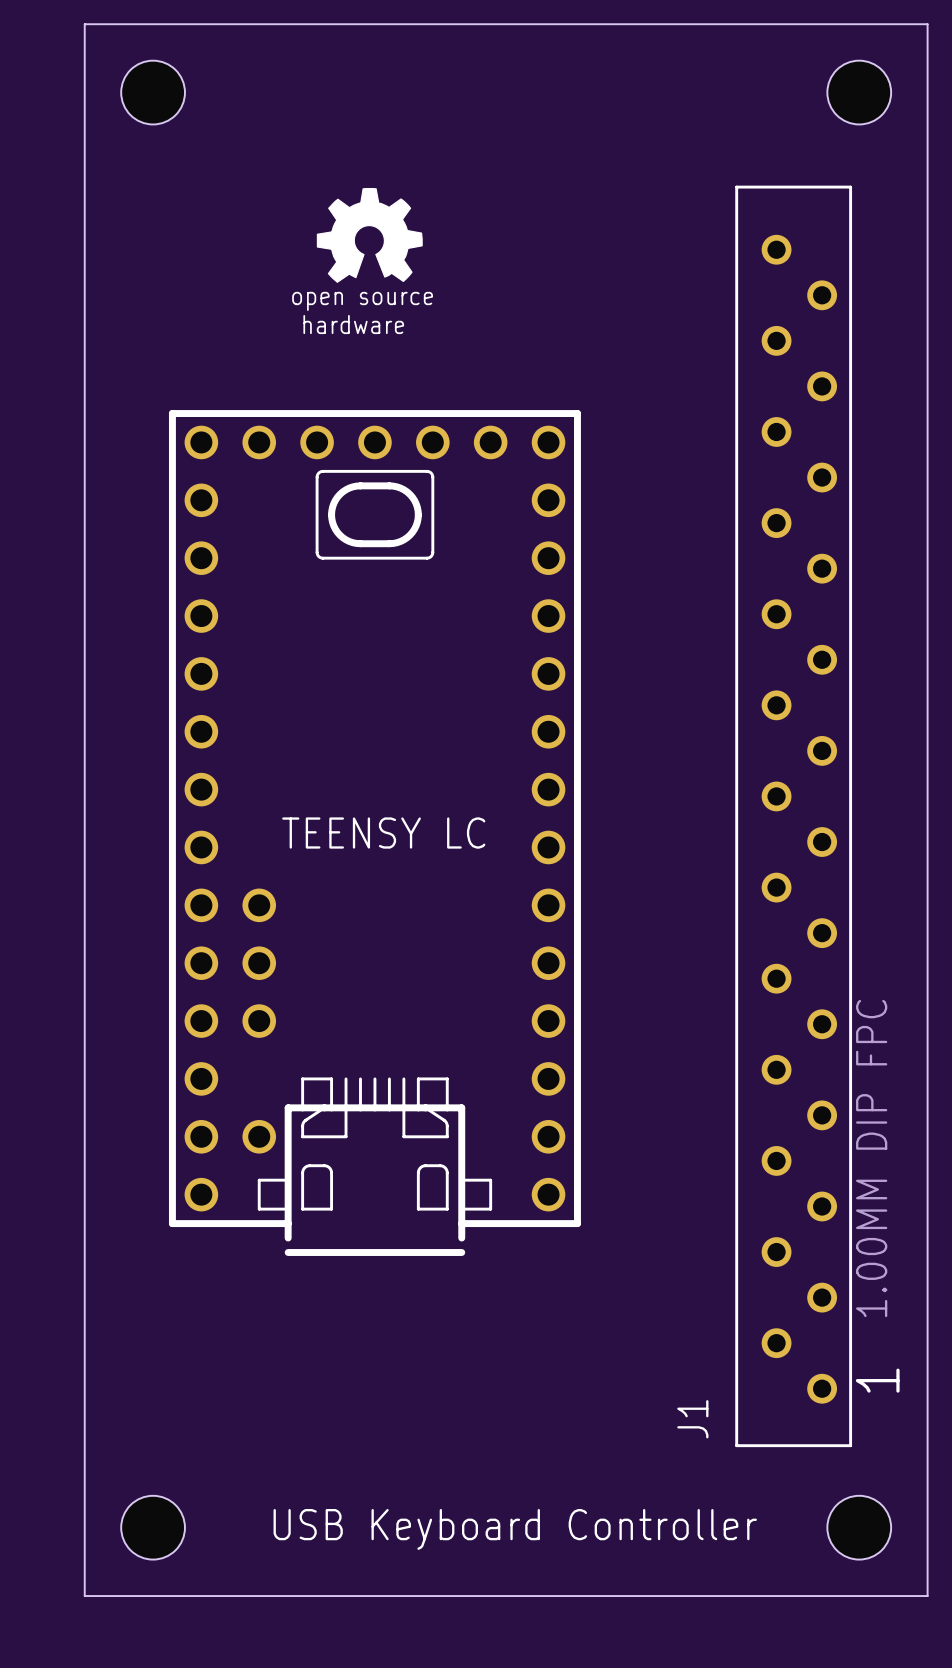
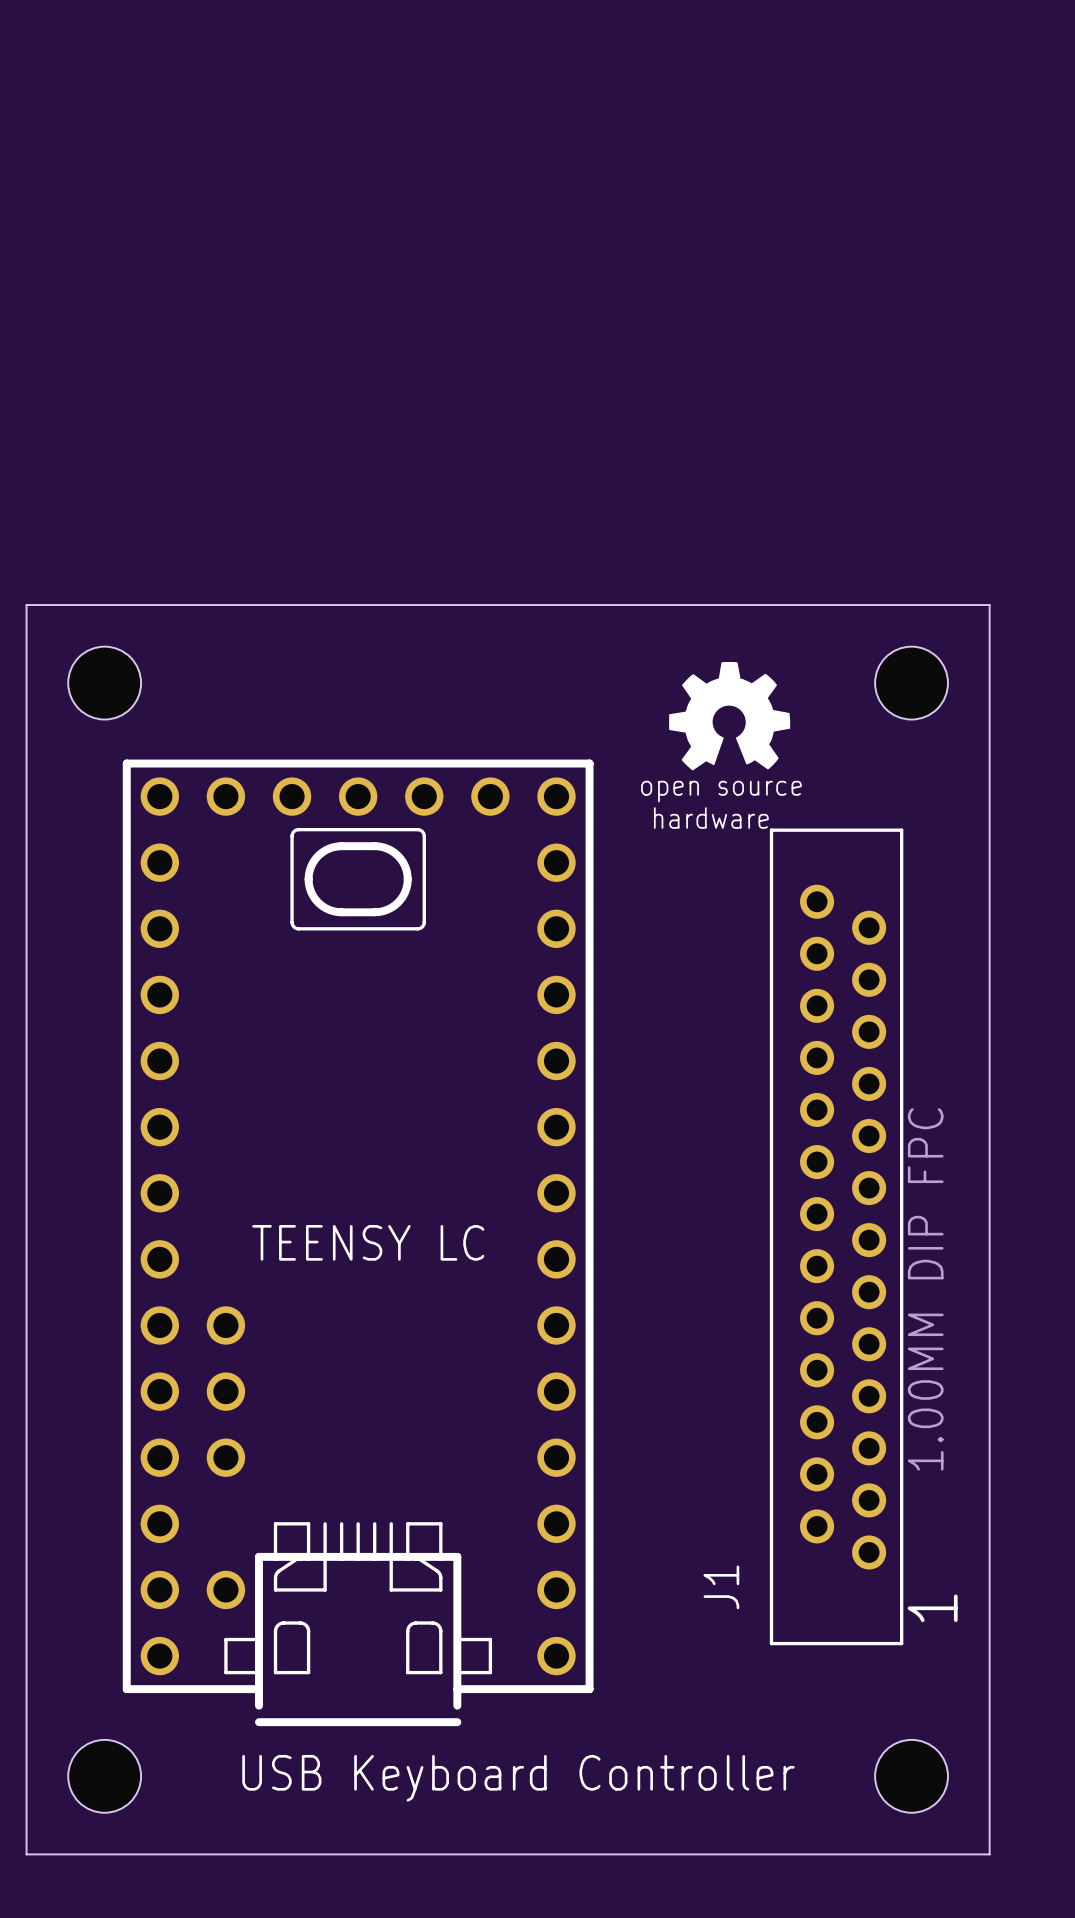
hole: (153, 92) -> none
hole: (859, 92) -> none
J1 footprint: [735, 185, 853, 1448] -> [769, 828, 904, 1646]
drawing position: (369, 235) -> (729, 716)
board edge: (84, 502) (84, 24) (927, 24) (927, 502) -> (26, 605) (989, 605)
hole: none -> (104, 683)
hole: none -> (911, 683)
part position: (374, 833) -> (358, 1242)
J1 value position: 1.00MM DIP FPC (871, 1158) -> 1.00MM DIP FPC (925, 1289)
J1 name position: J1 (692, 1419) -> J1 (721, 1587)

